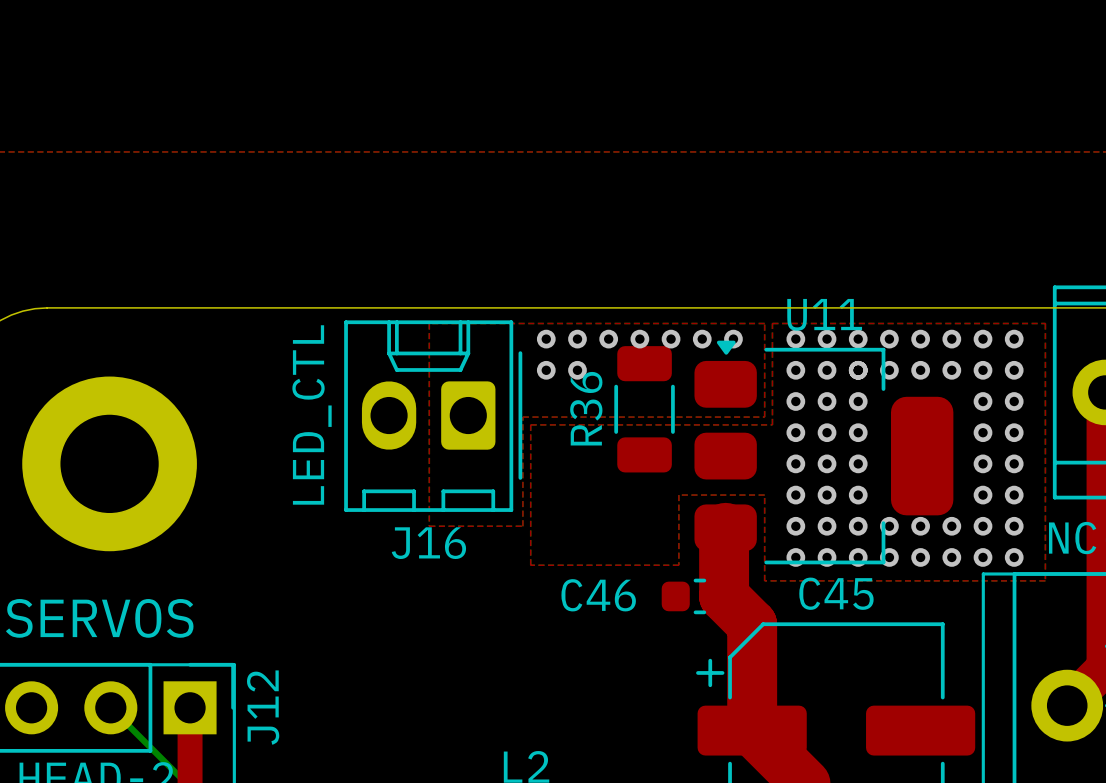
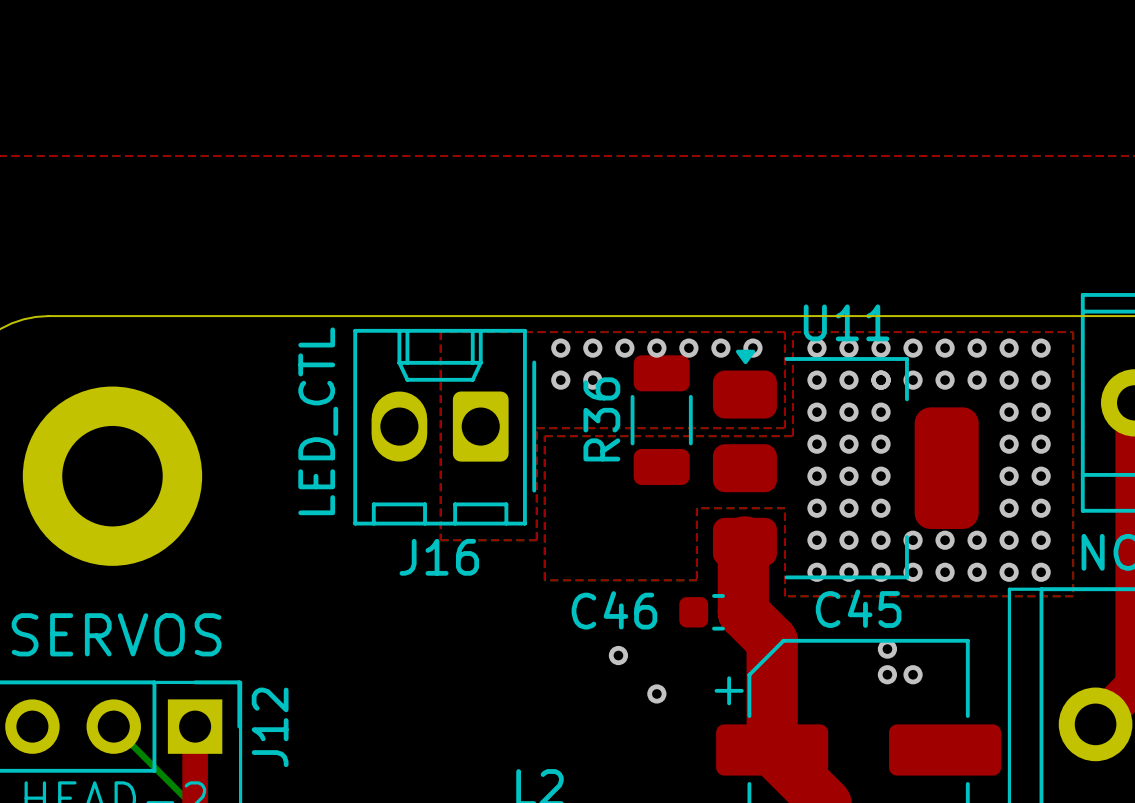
via: none -> (887, 649)
via: none -> (618, 655)
via: none -> (887, 674)
via: none -> (913, 674)
via: none -> (656, 693)

